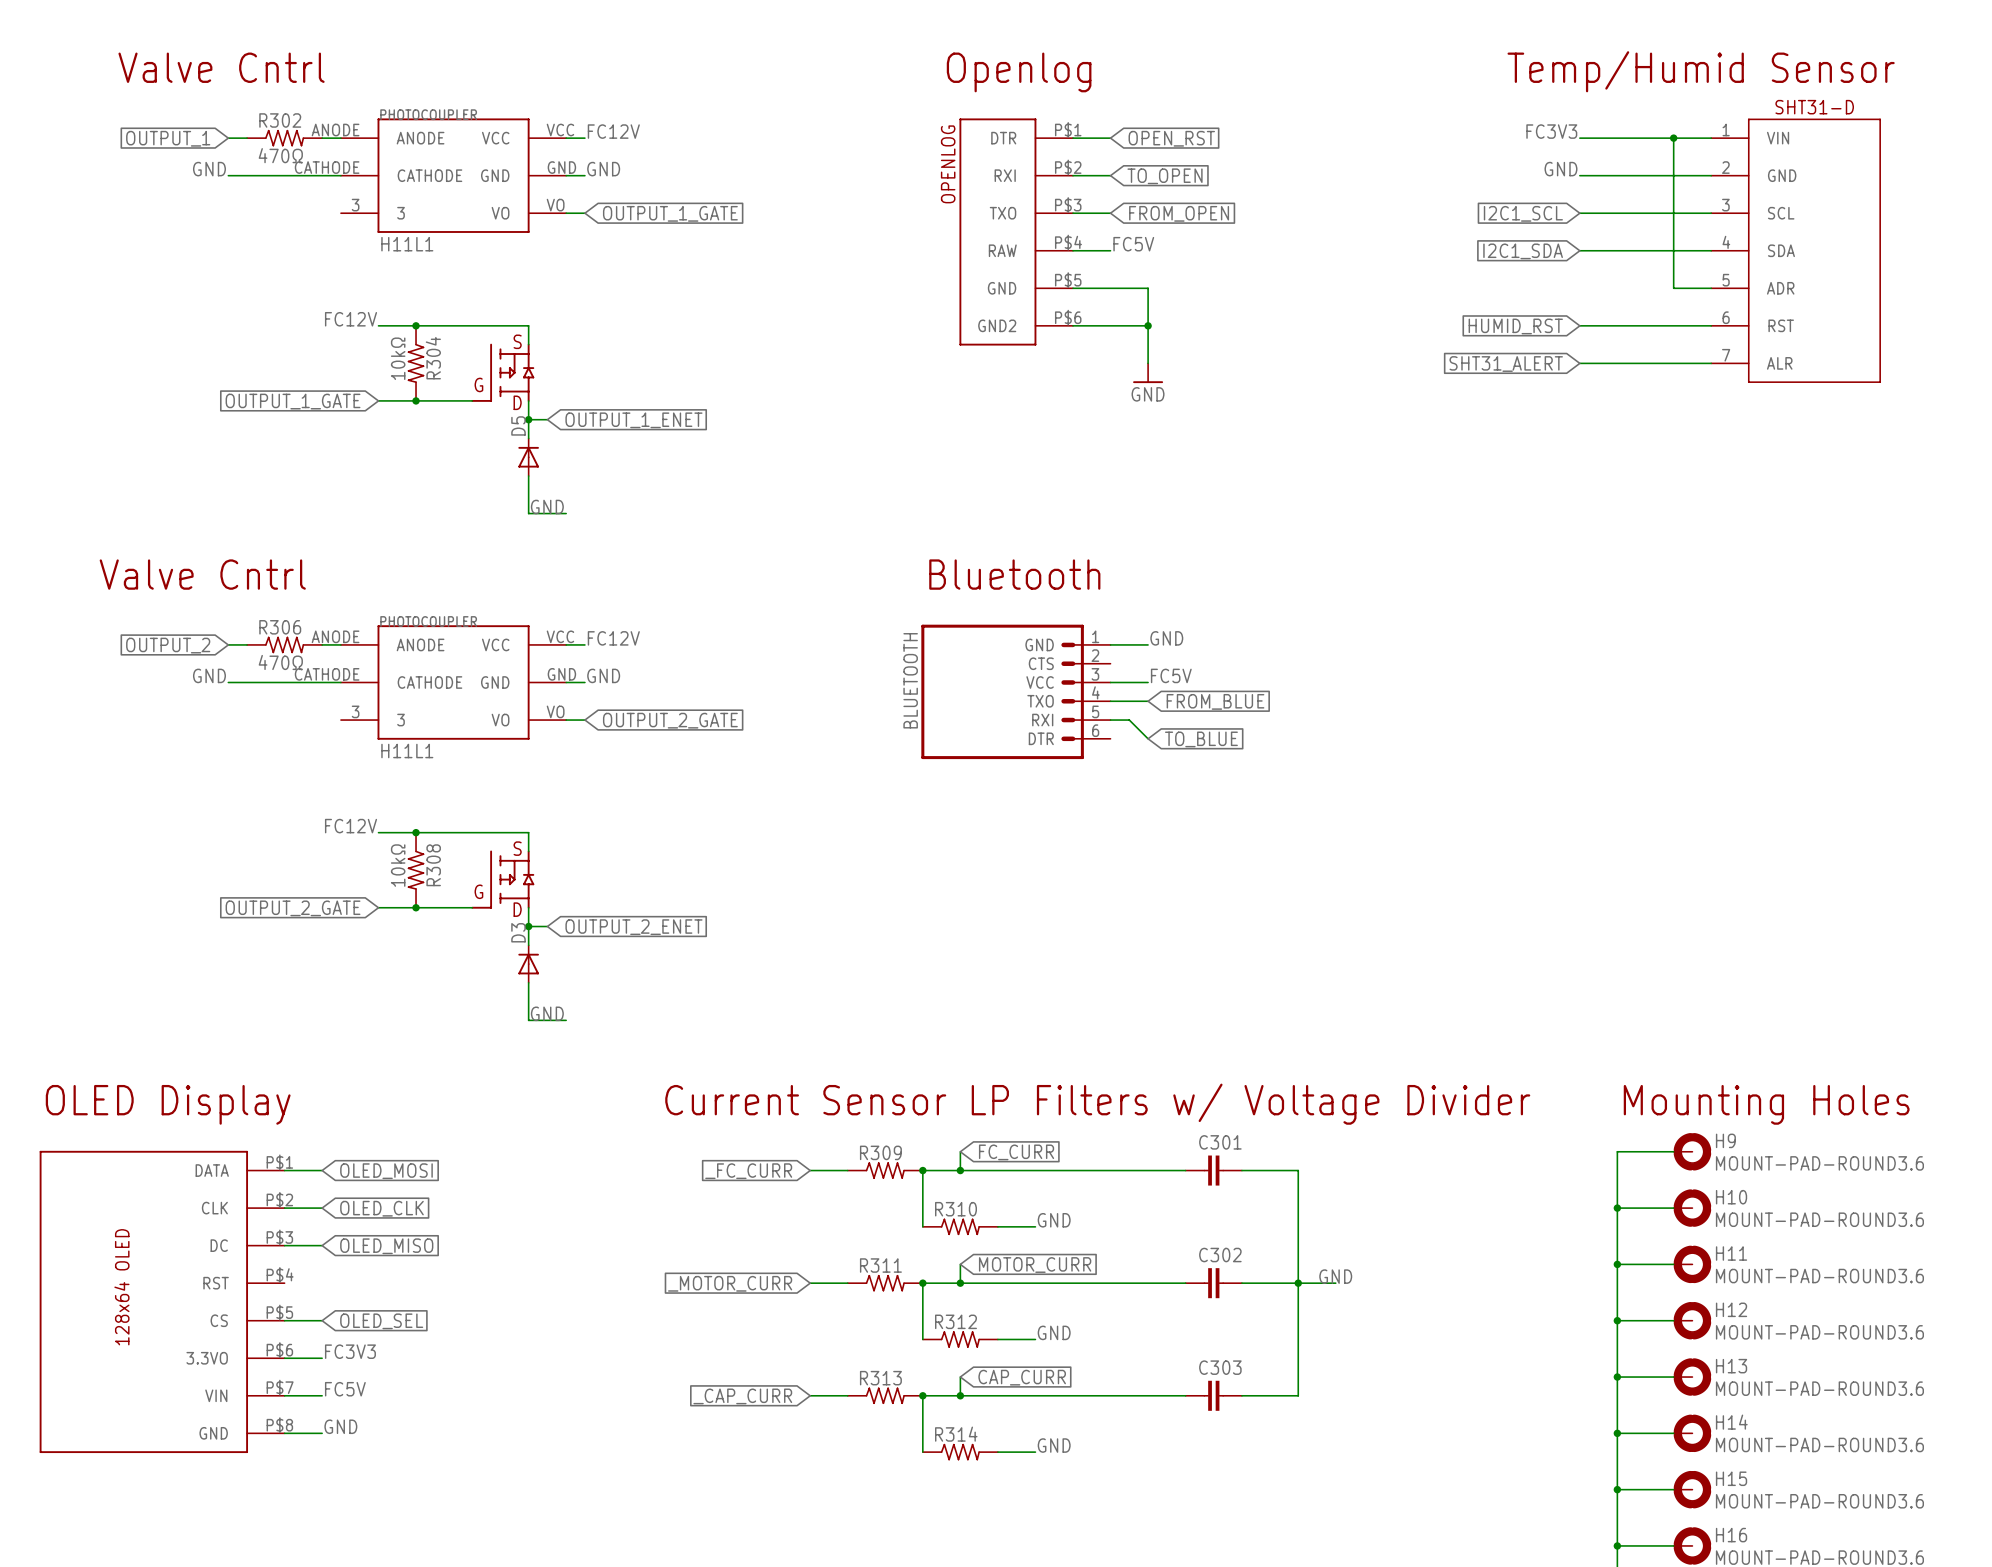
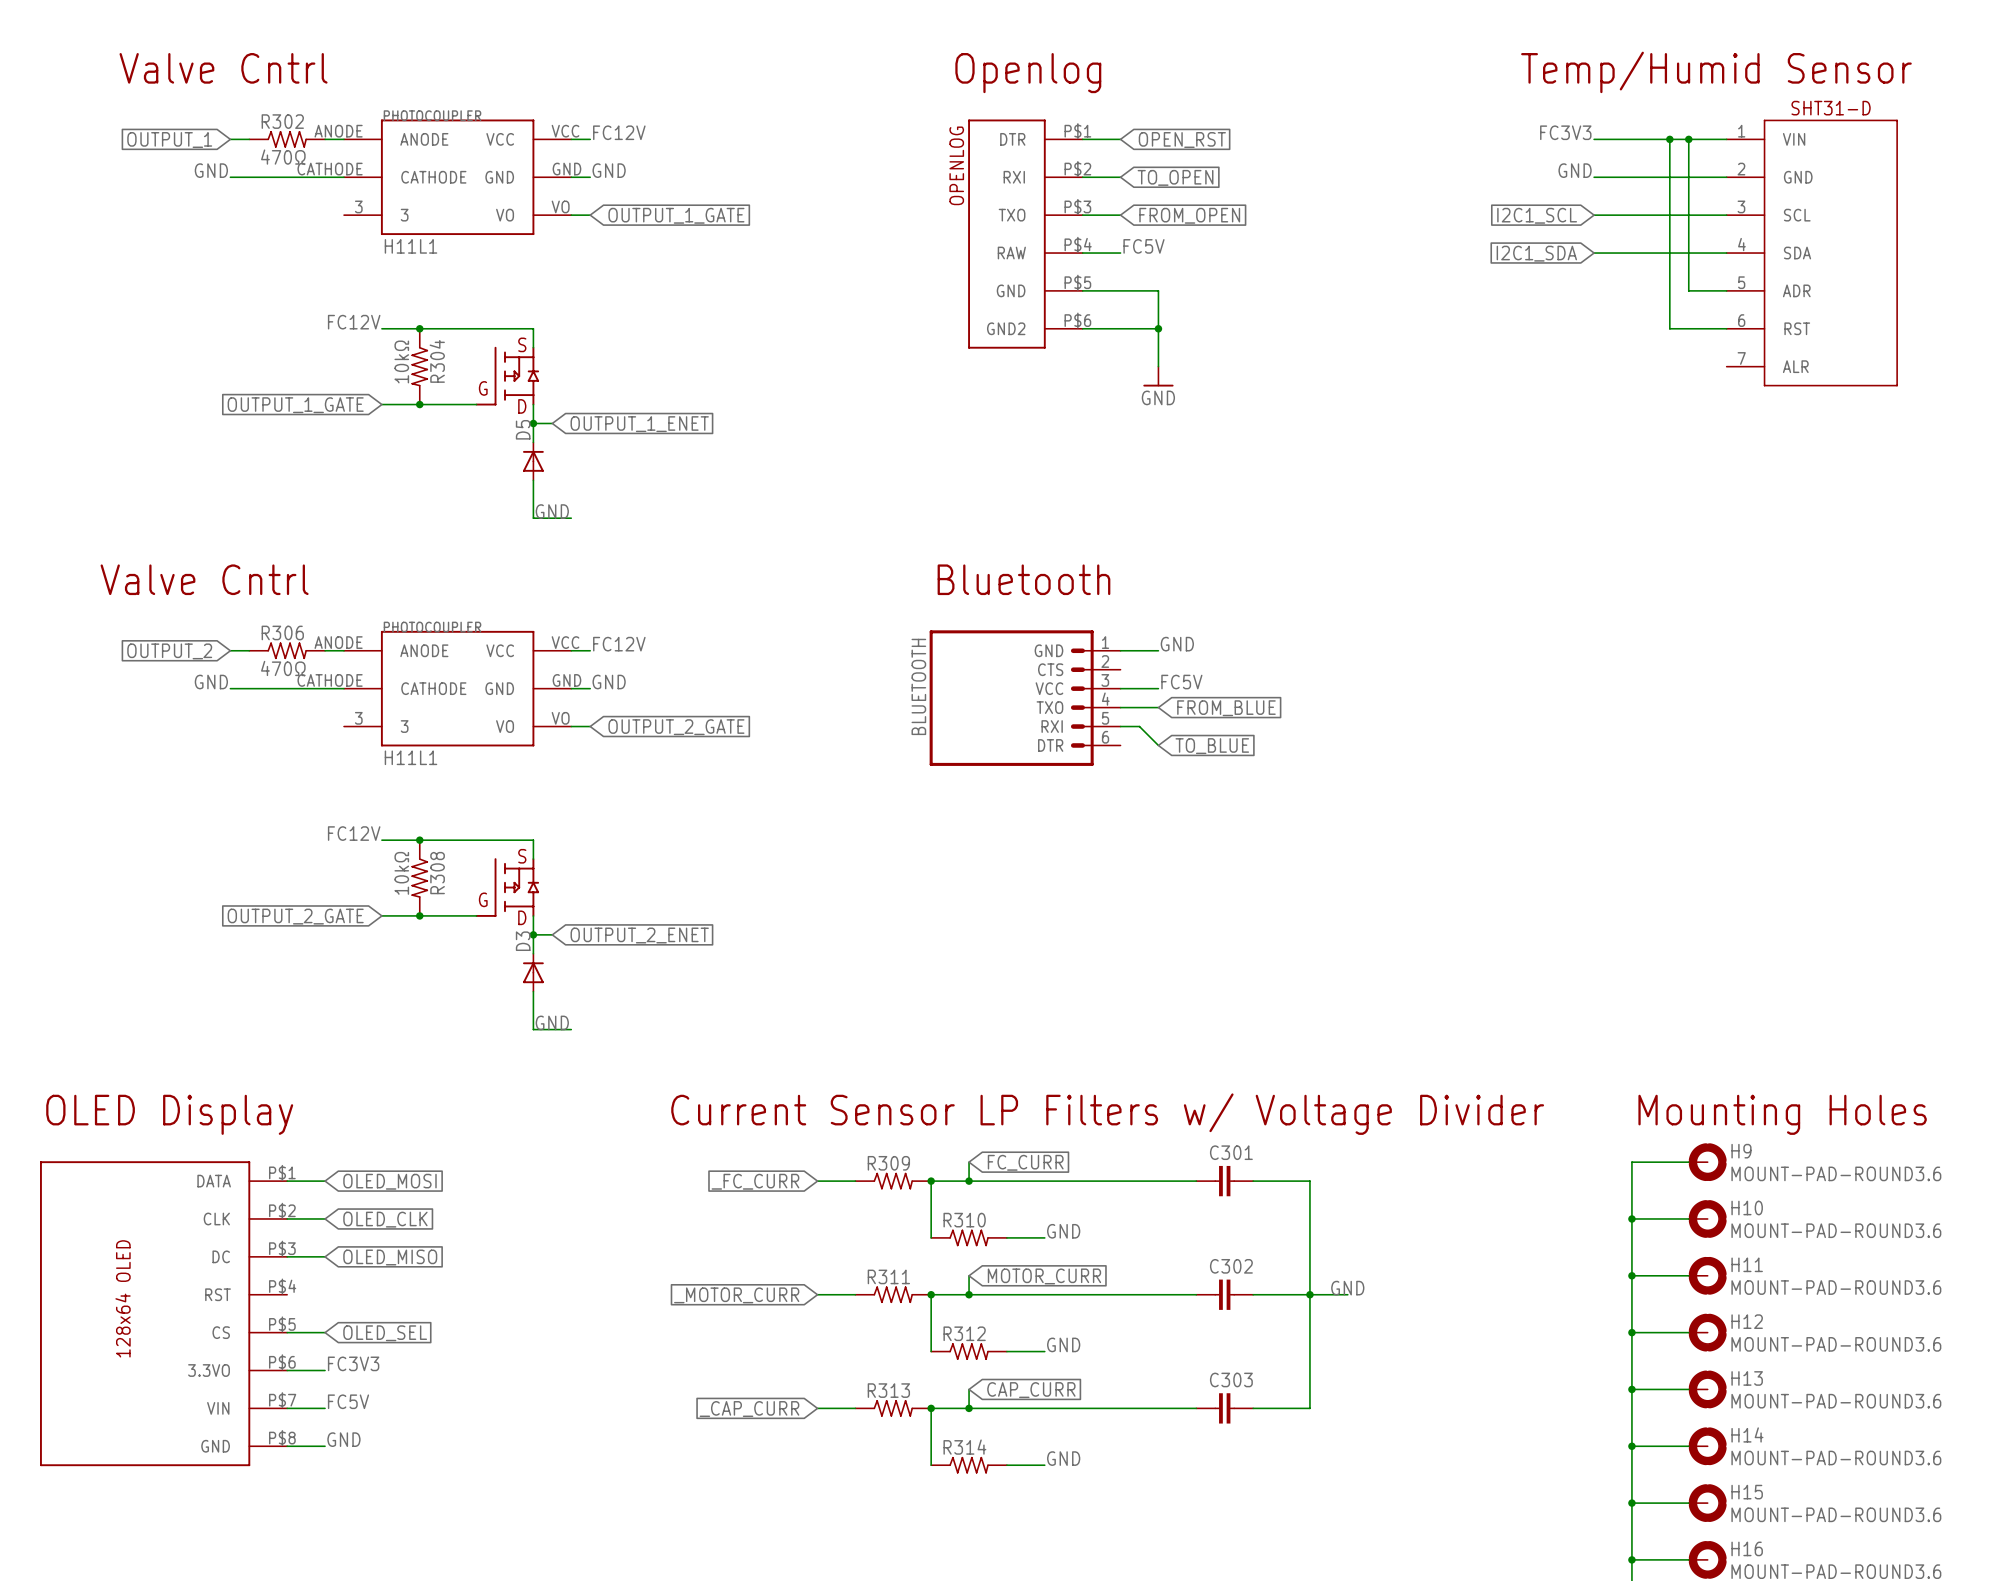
junction: none -> (1669, 139)
wire: (1579, 325) (1654, 325) -> (1669, 139) (1669, 328)
global label: HUMID_RST (1515, 326) -> none
wire: (1579, 363) (1711, 363) -> none
global label: SHT31_ALERT (1506, 364) -> none

